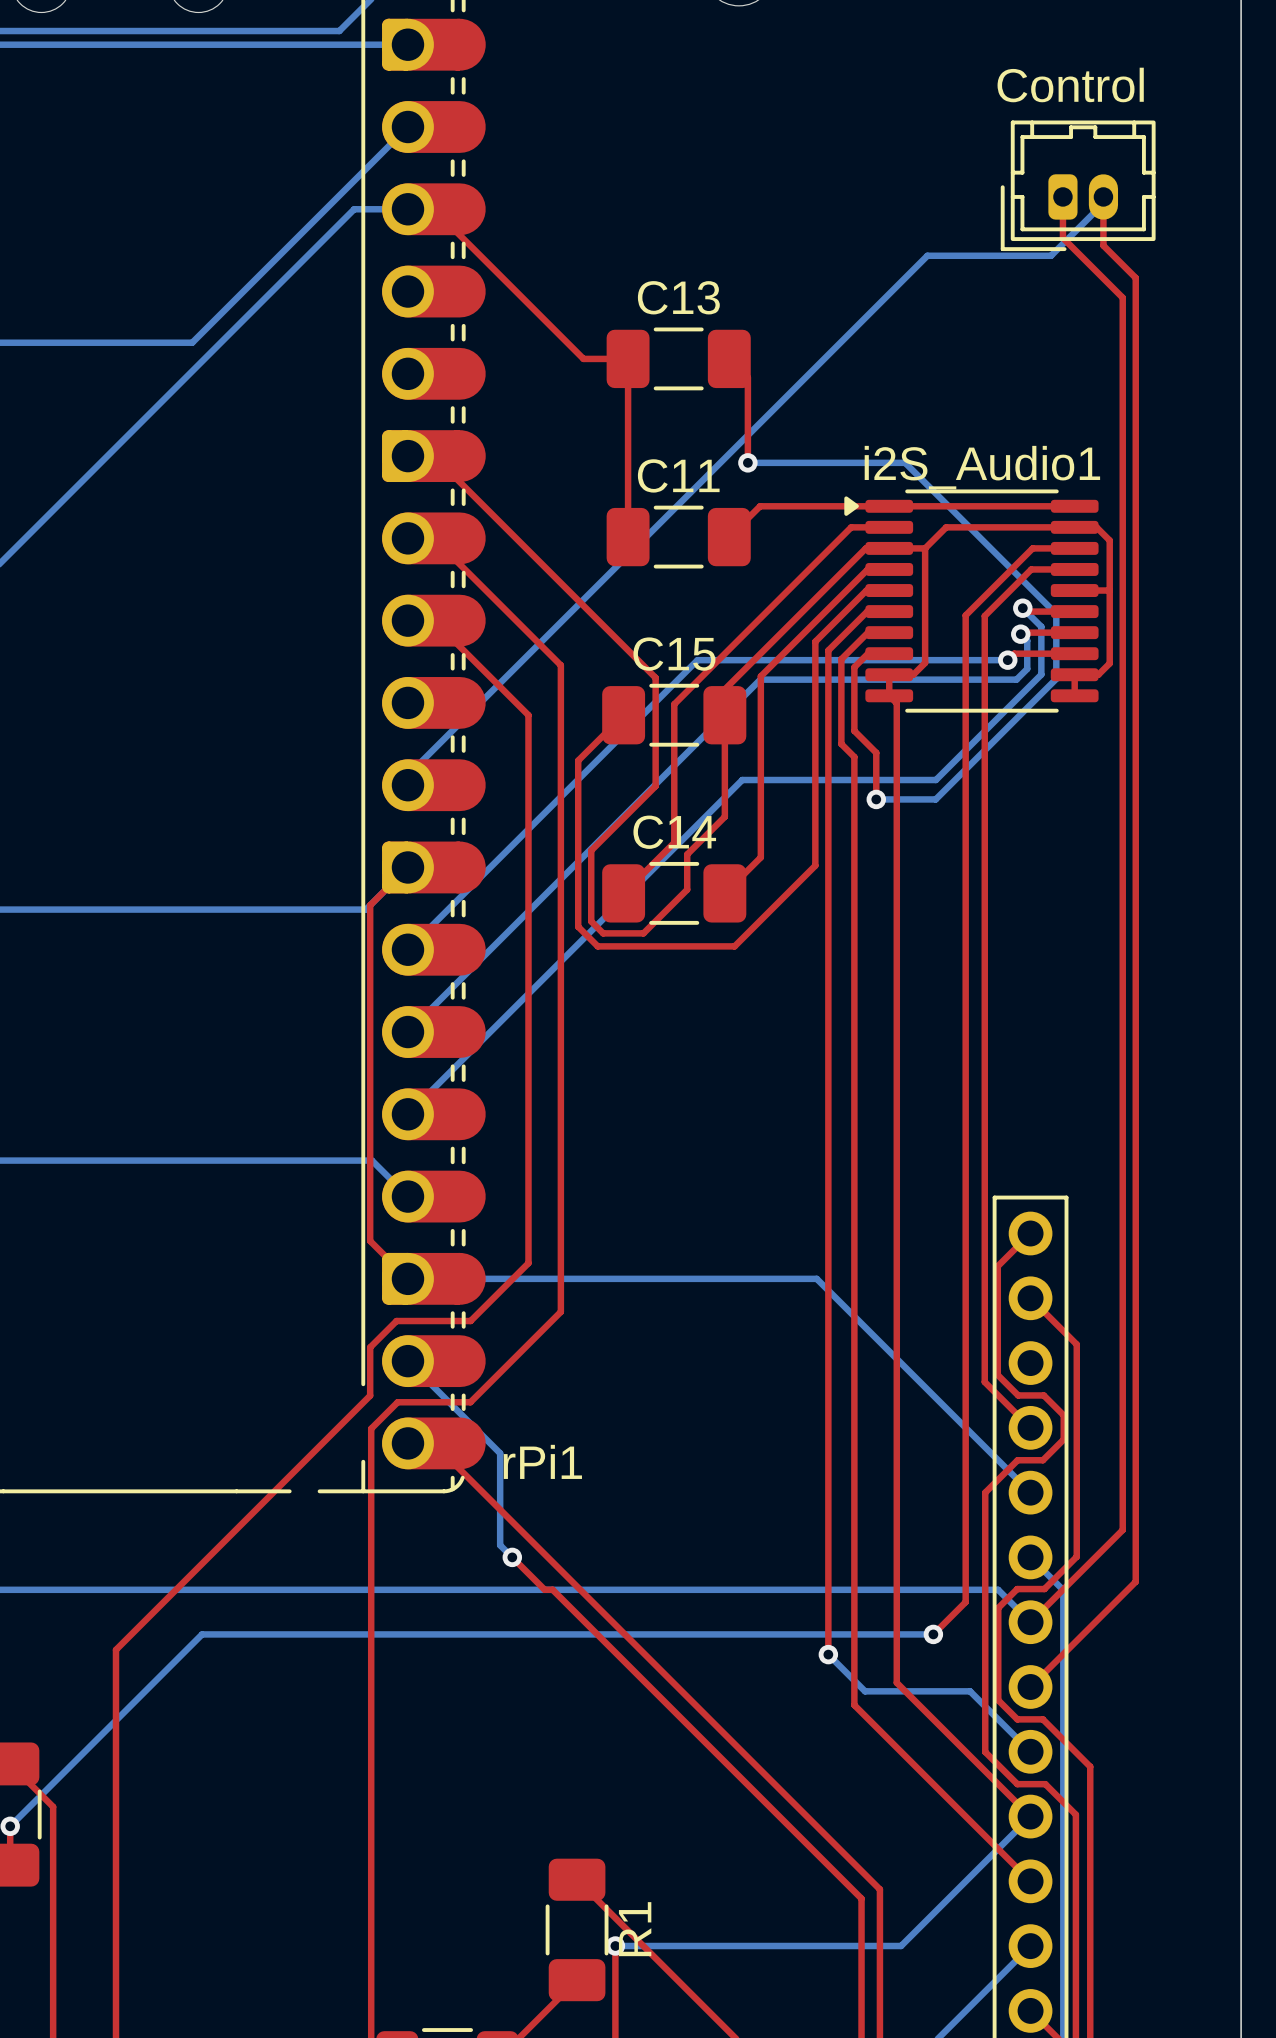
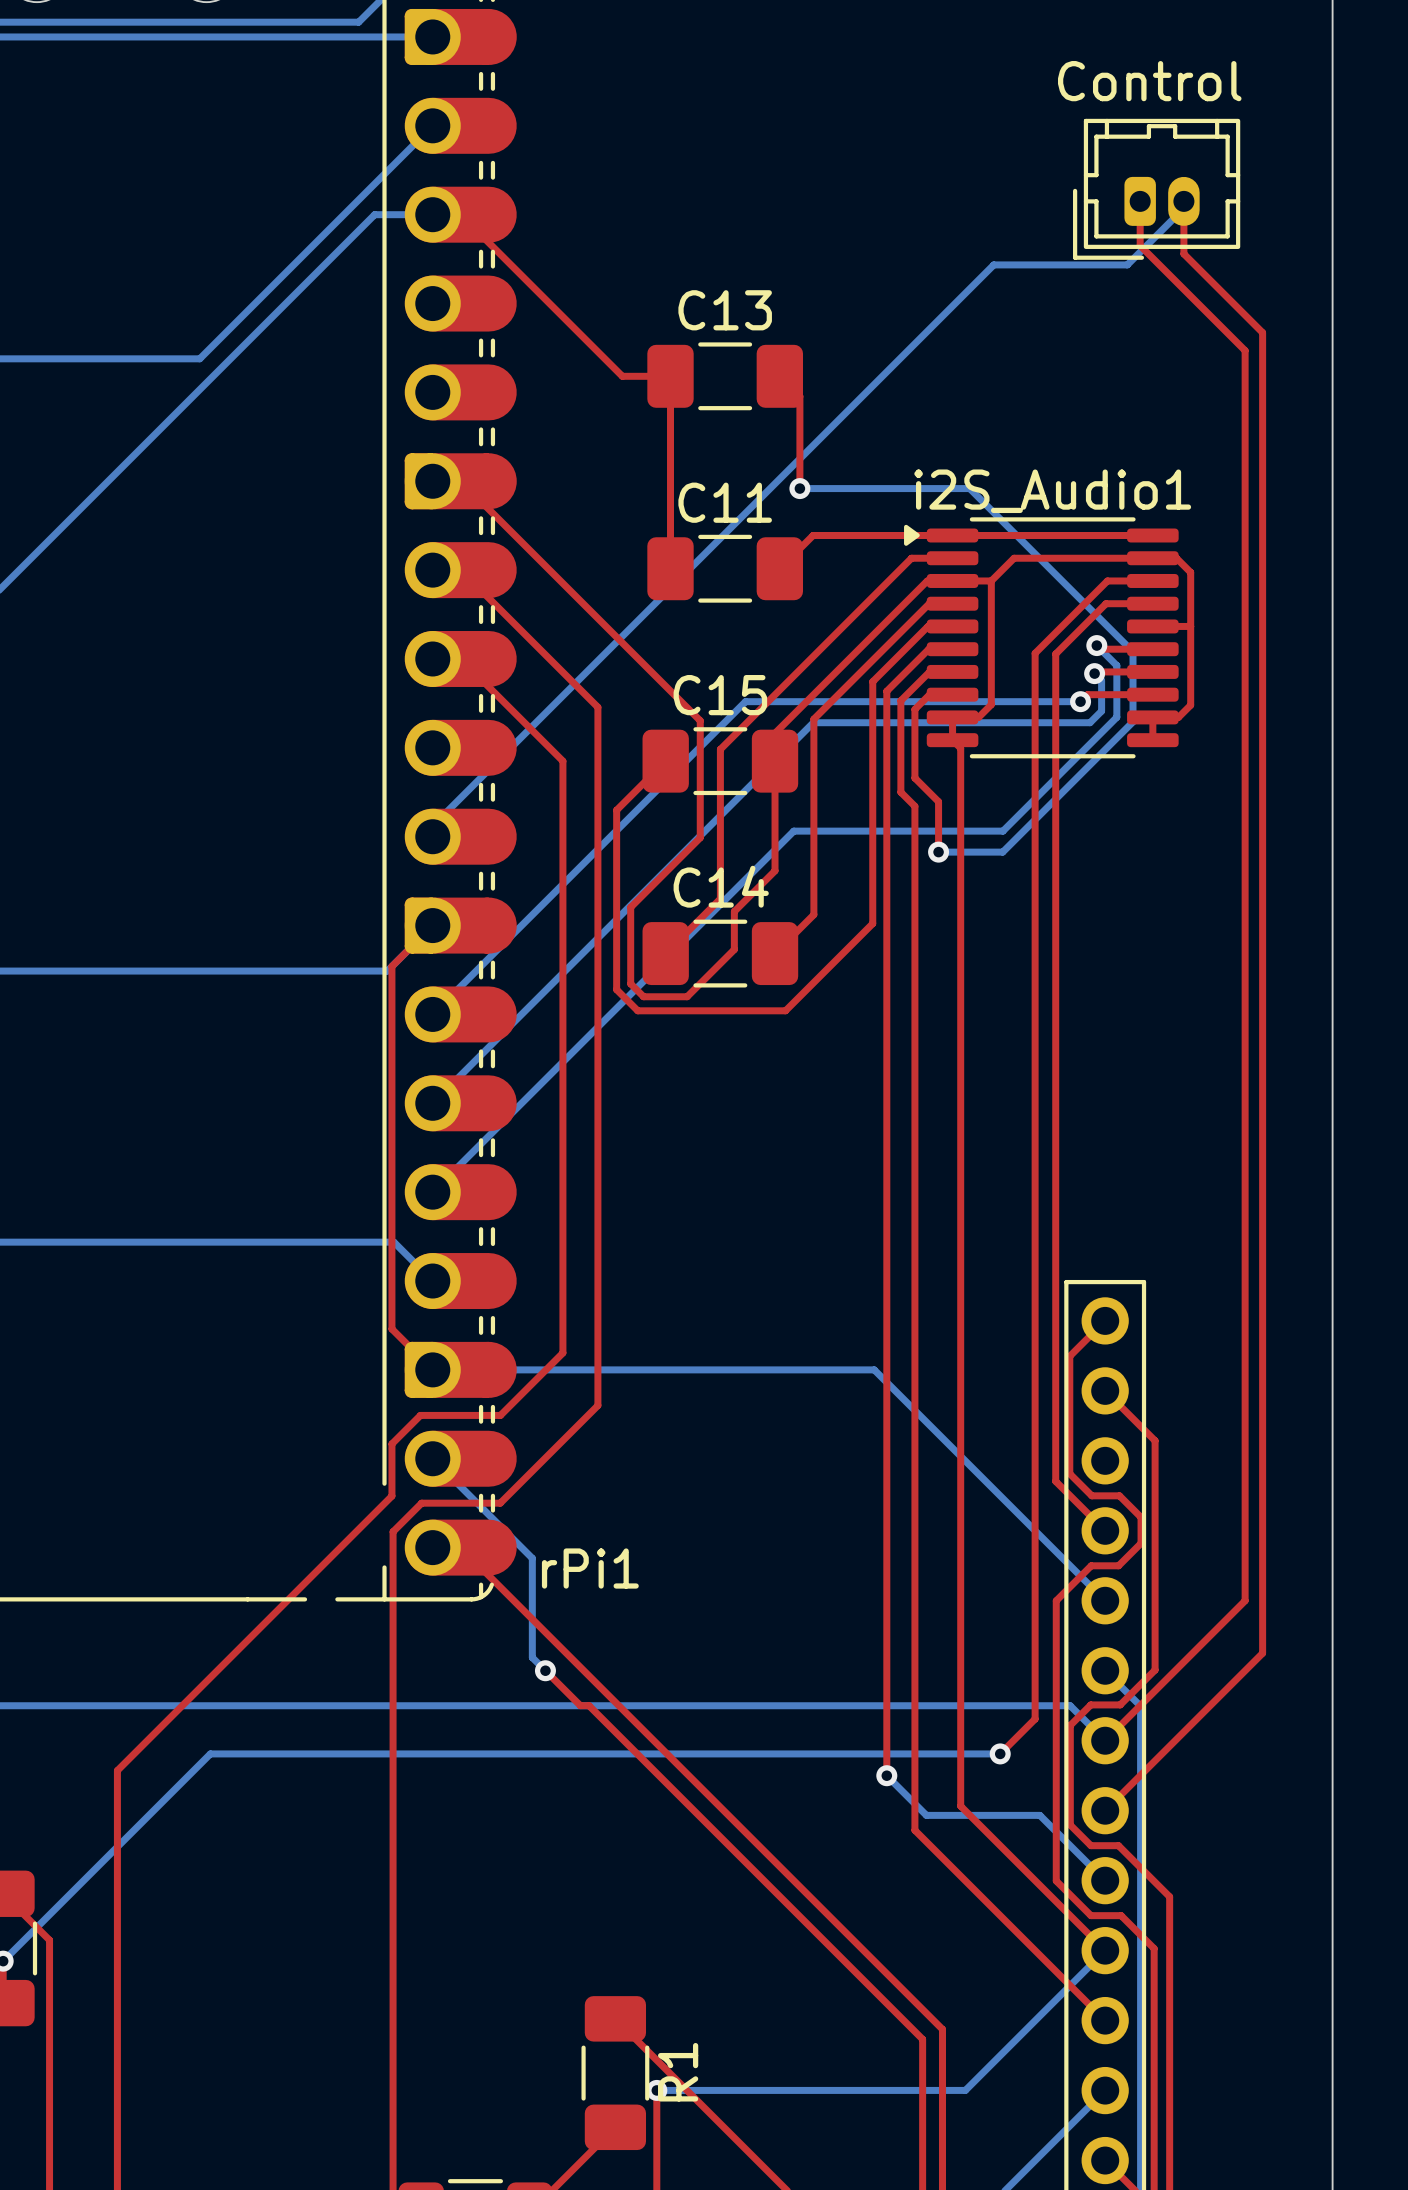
top track: (1135, 277) (1135, 1581) -> (1218, 288) (1262, 332) (1262, 1653) (1218, 1697)
top track: (1122, 297) (1122, 1530) -> (1204, 310) (1245, 350) (1245, 1600) (1204, 1641)

